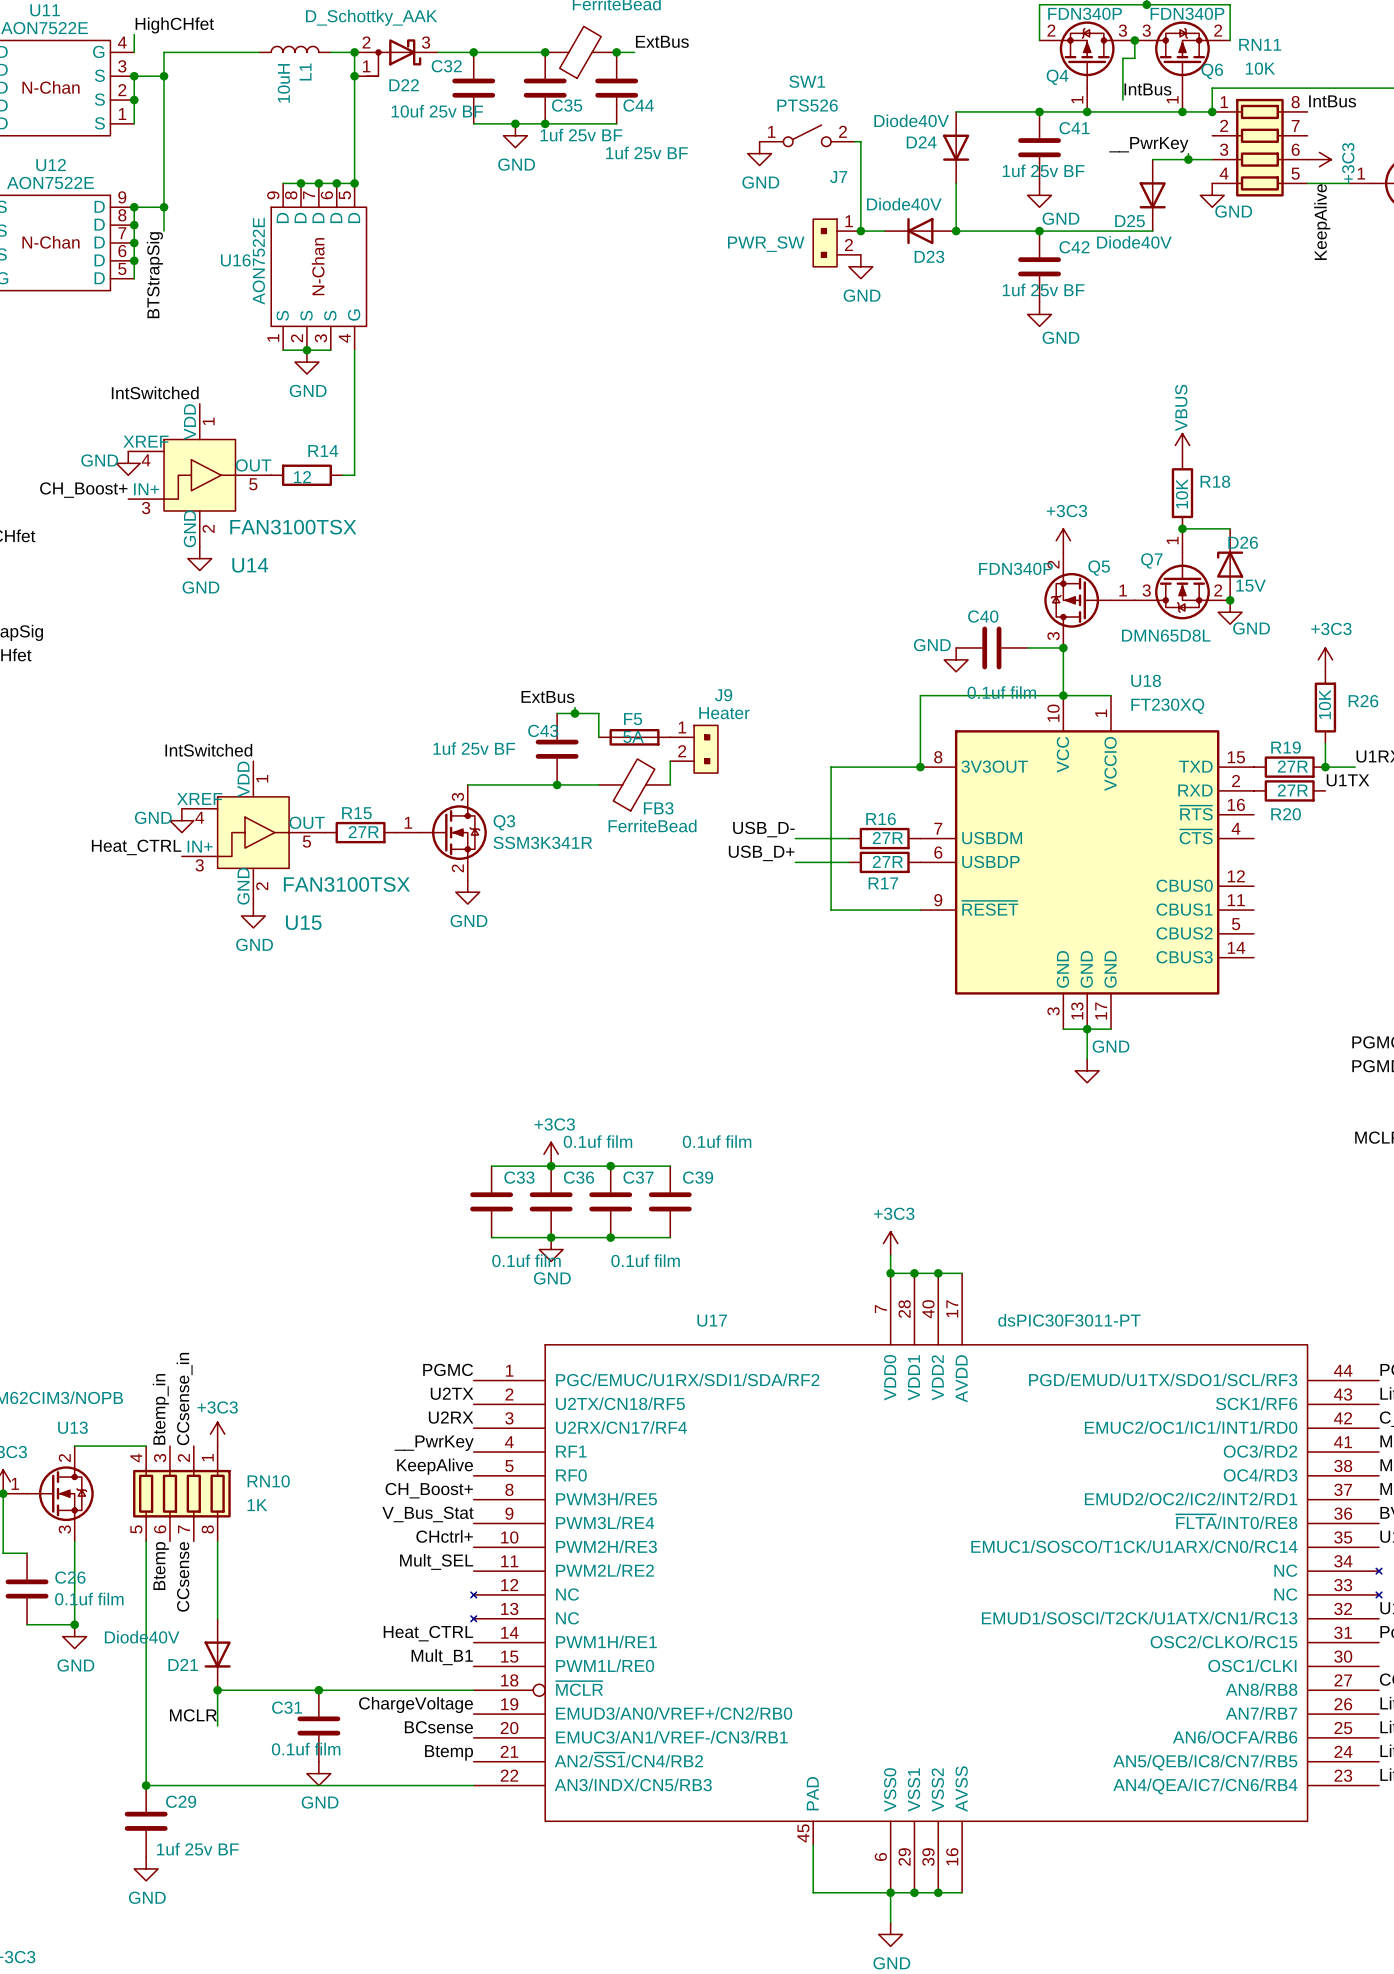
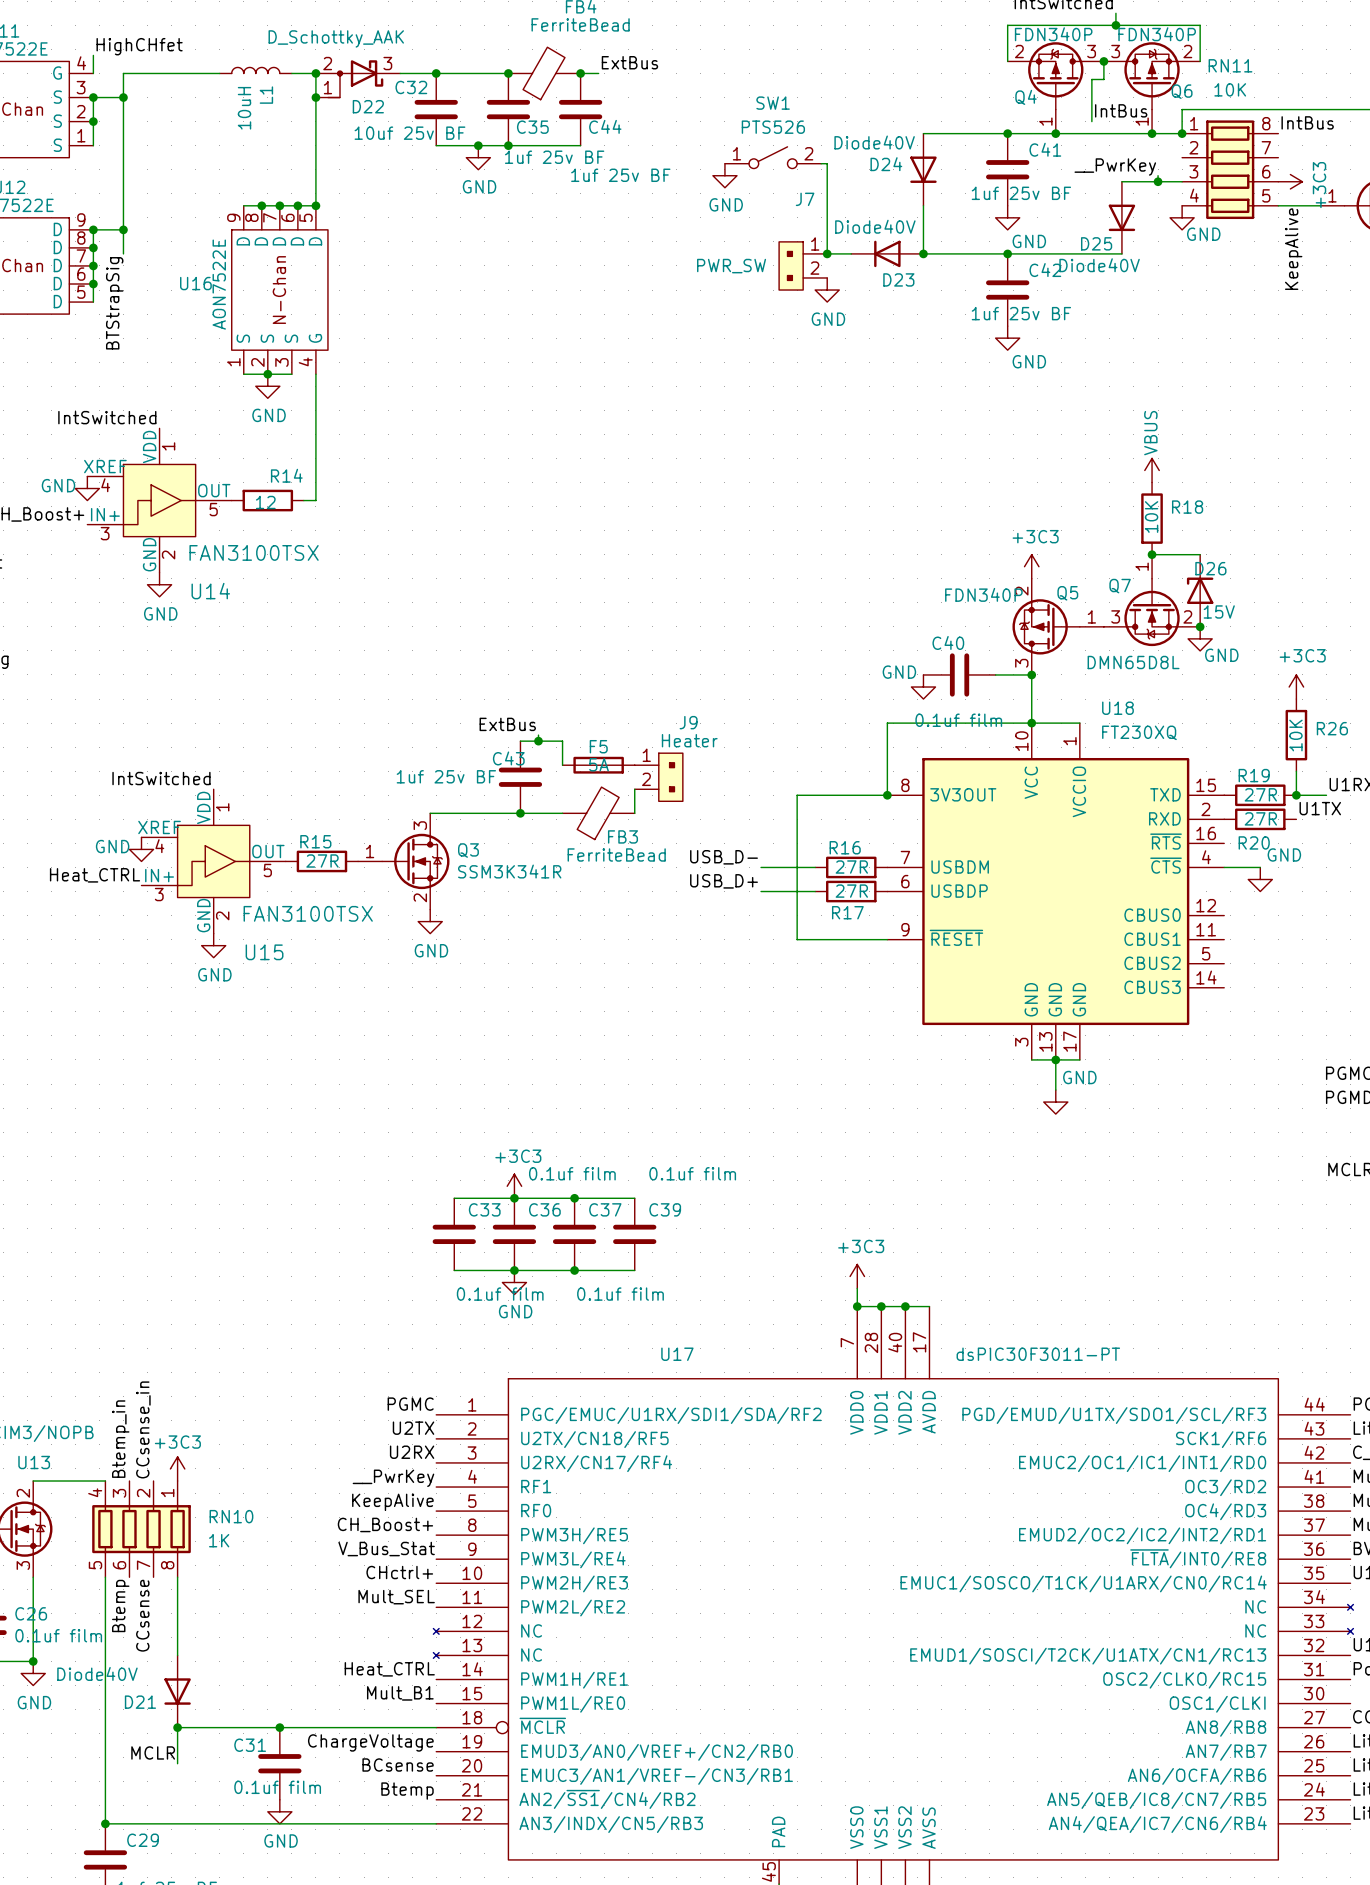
wire: none -> (1224, 867) (1260, 867)
power symbol: none -> GND (1260, 879)

